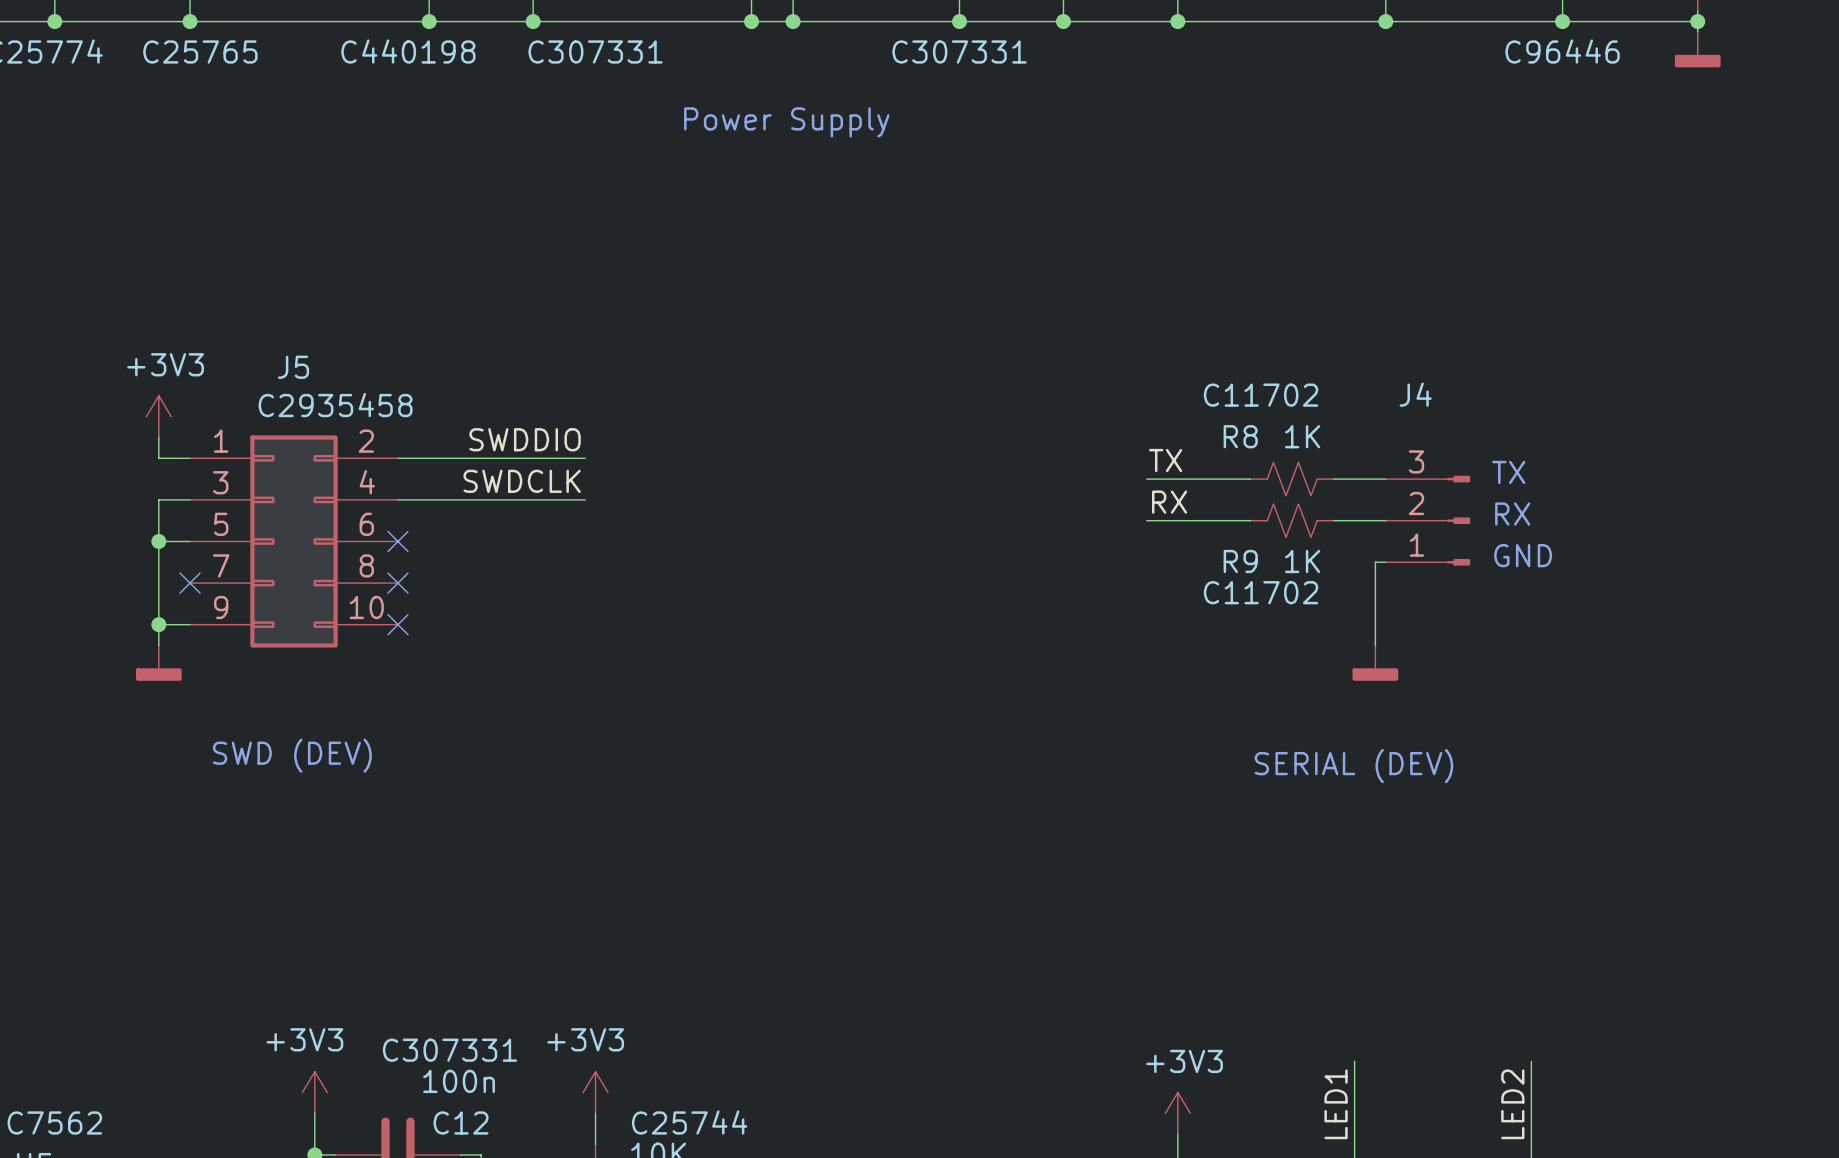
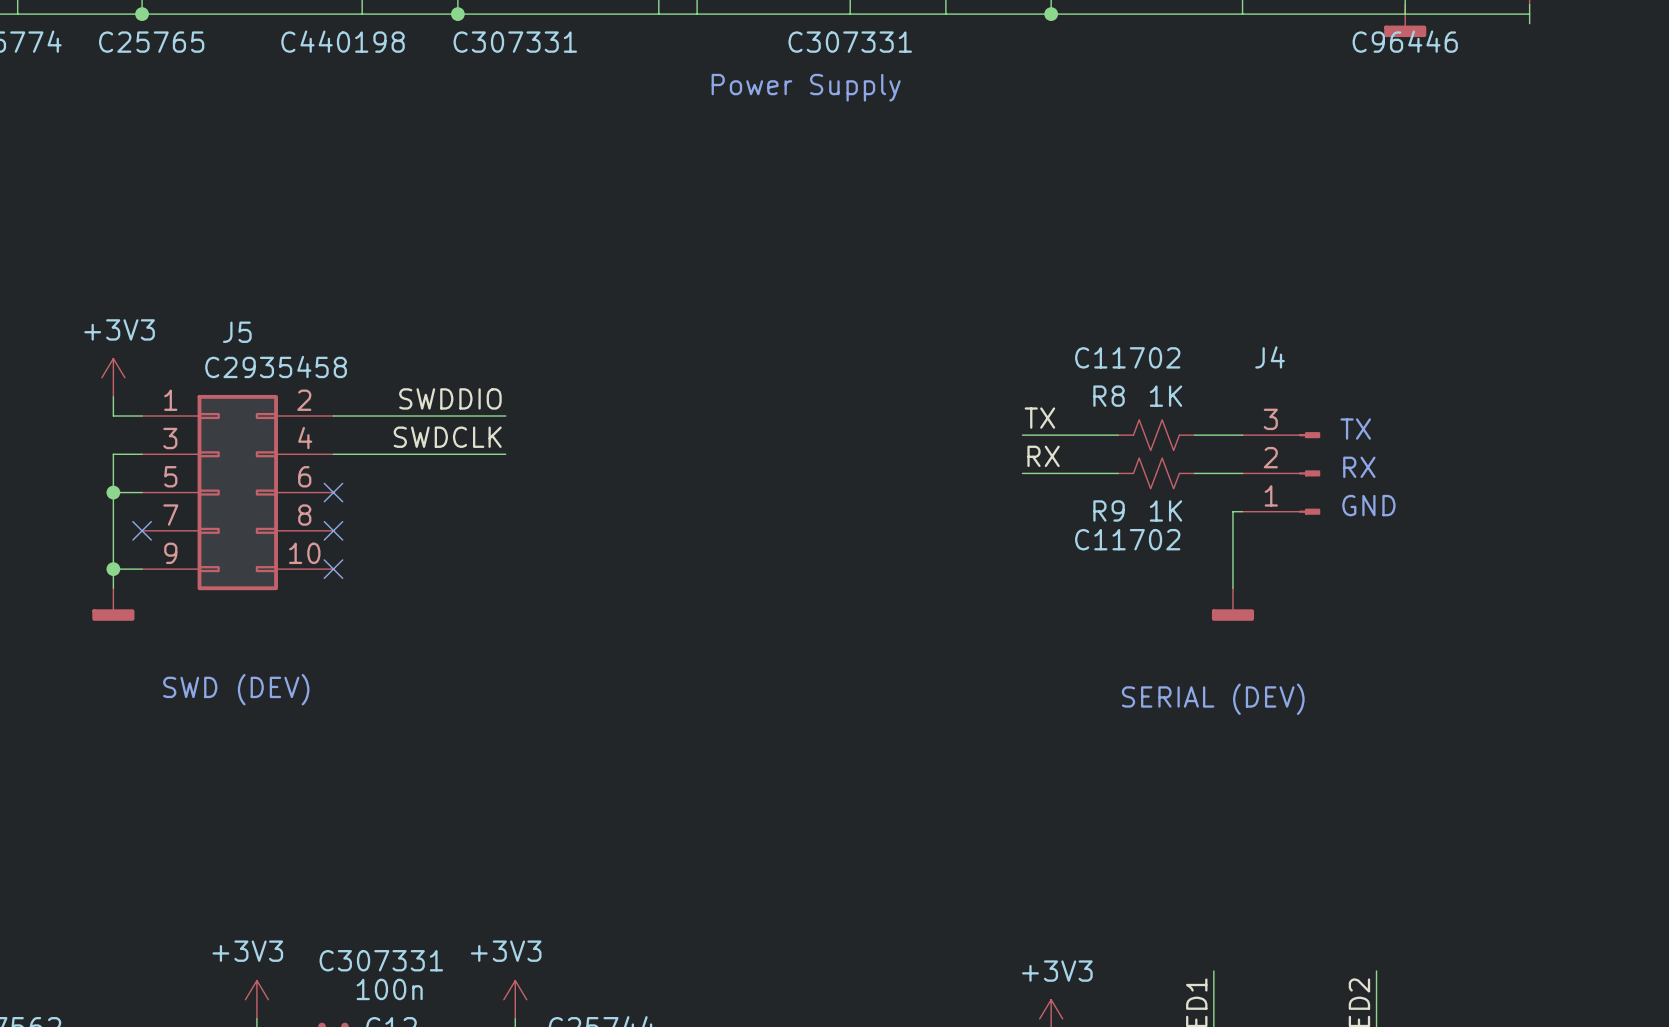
junction: (54, 21) -> none
junction: (429, 21) -> none
junction: (751, 21) -> none
junction: (793, 21) -> none
junction: (959, 21) -> none
junction: (1063, 21) -> none
junction: (1385, 21) -> none
junction: (1562, 21) -> none
junction: (1697, 21) -> none
power symbol position: (1697, 49) -> (1405, 20)
text position: Power Supply (786, 122) -> Power Supply (806, 87)

